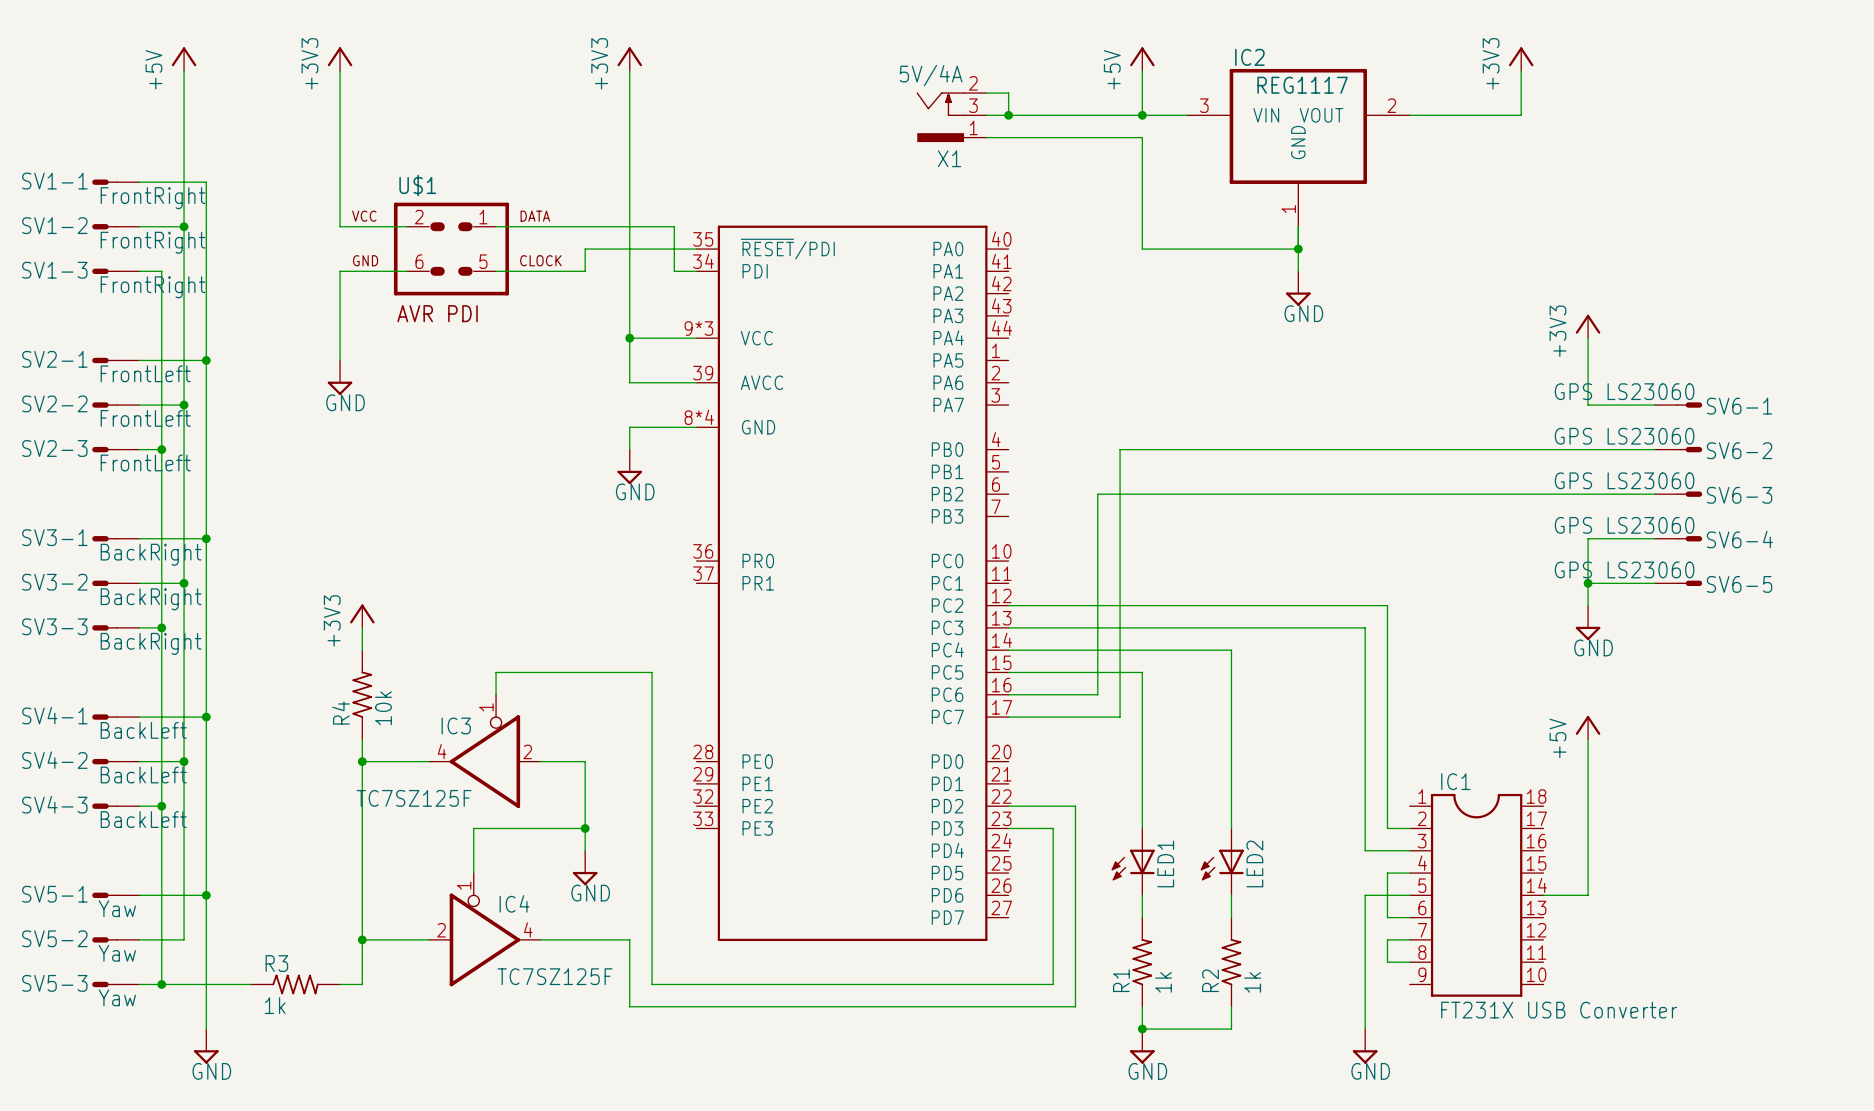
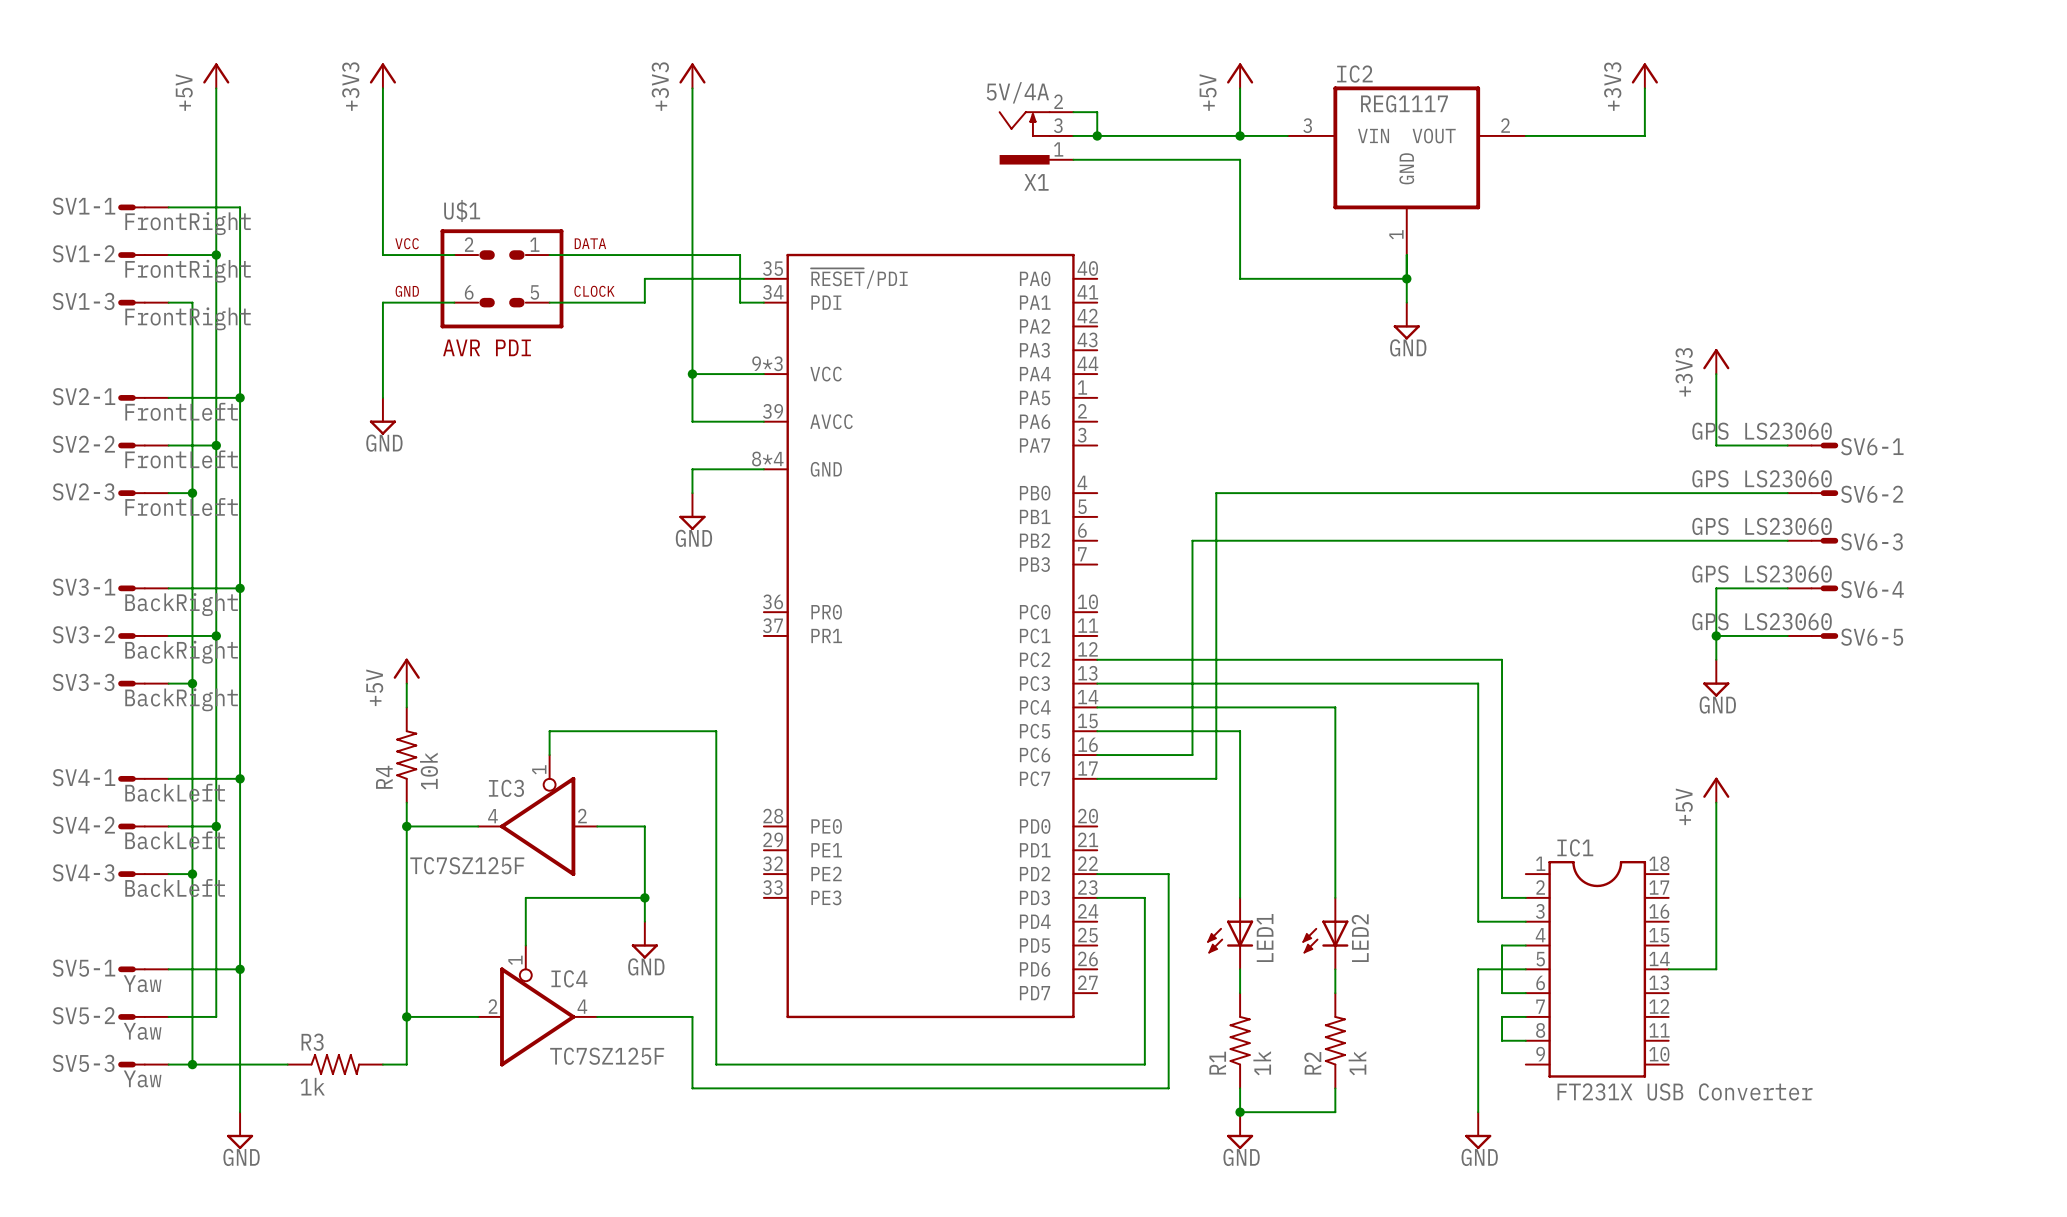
power symbol: +3V3 (362, 616) -> +5V (406, 671)

